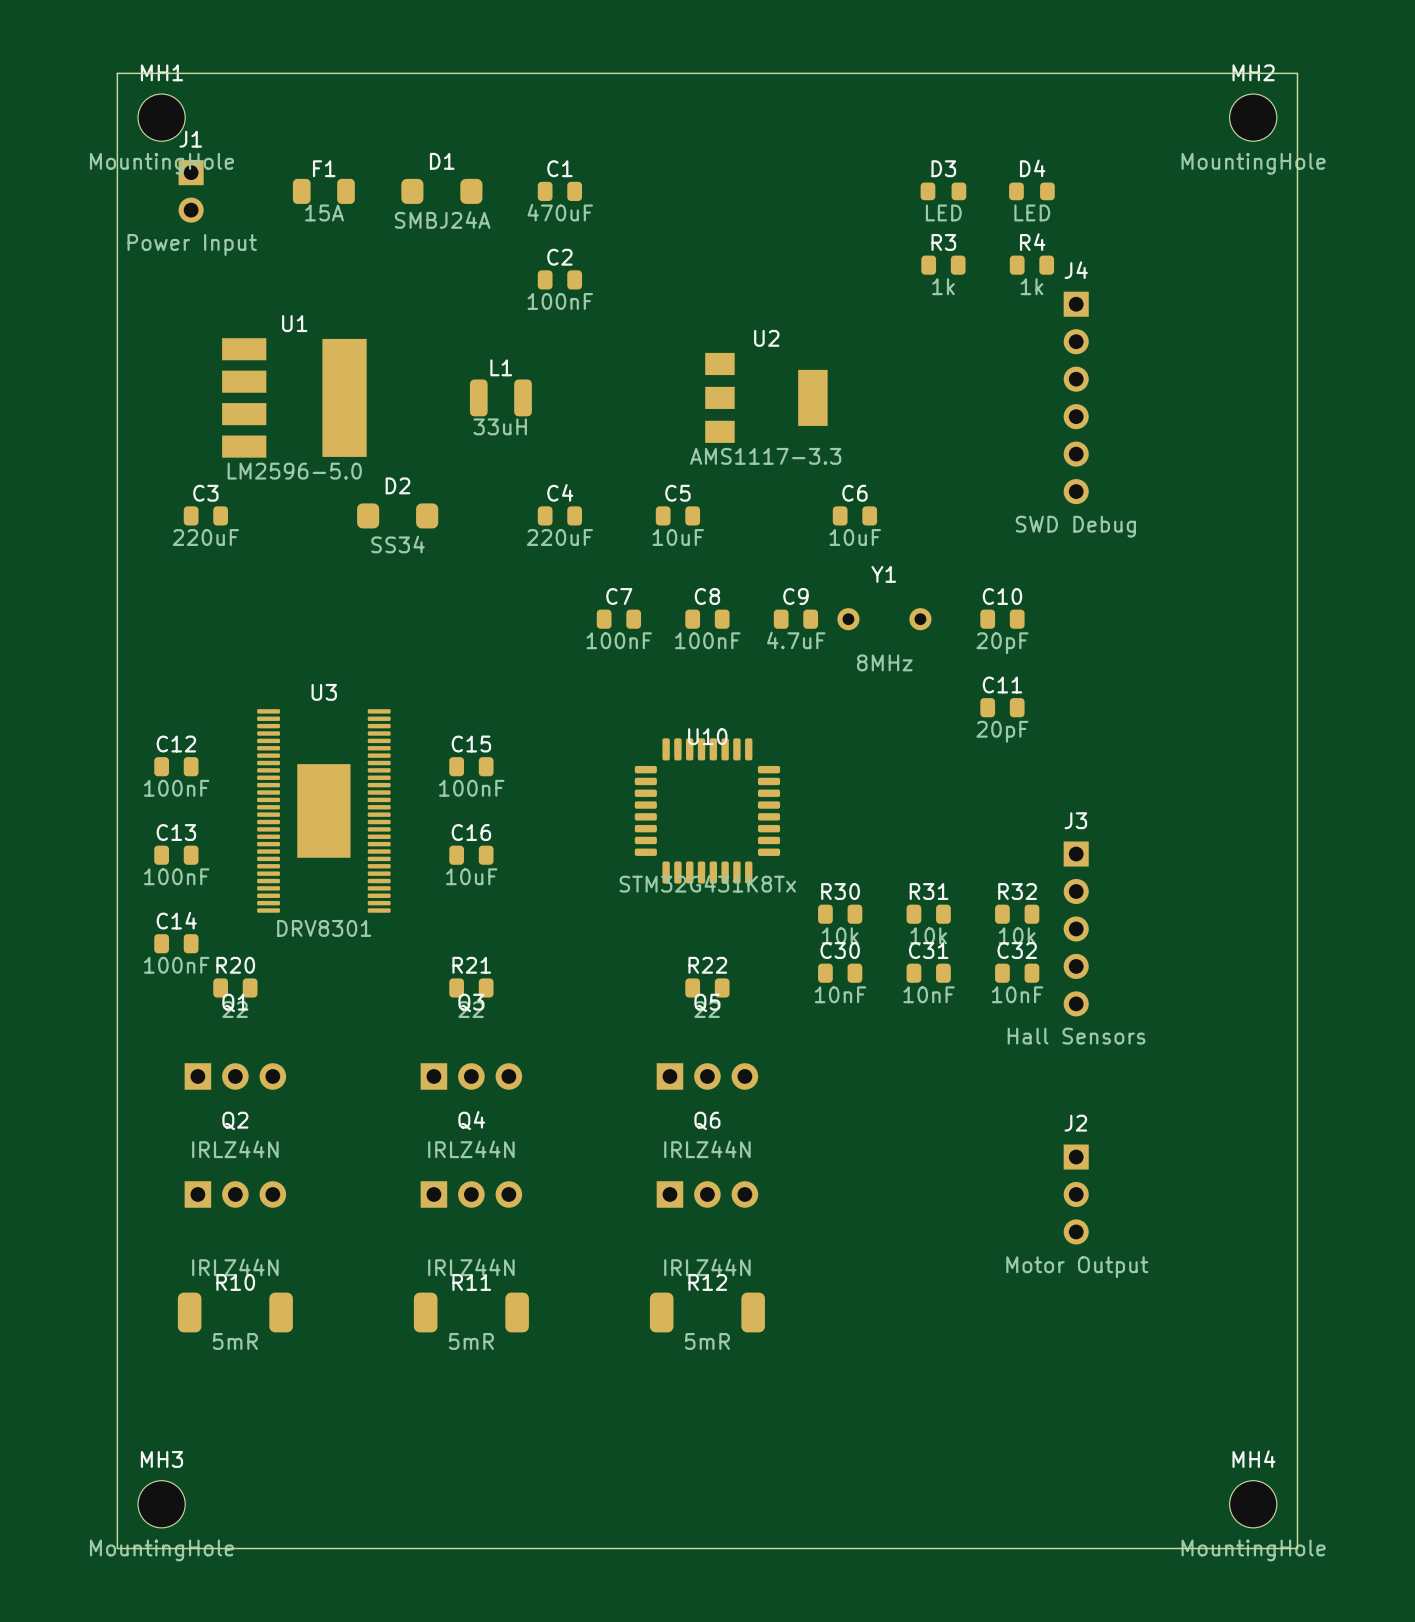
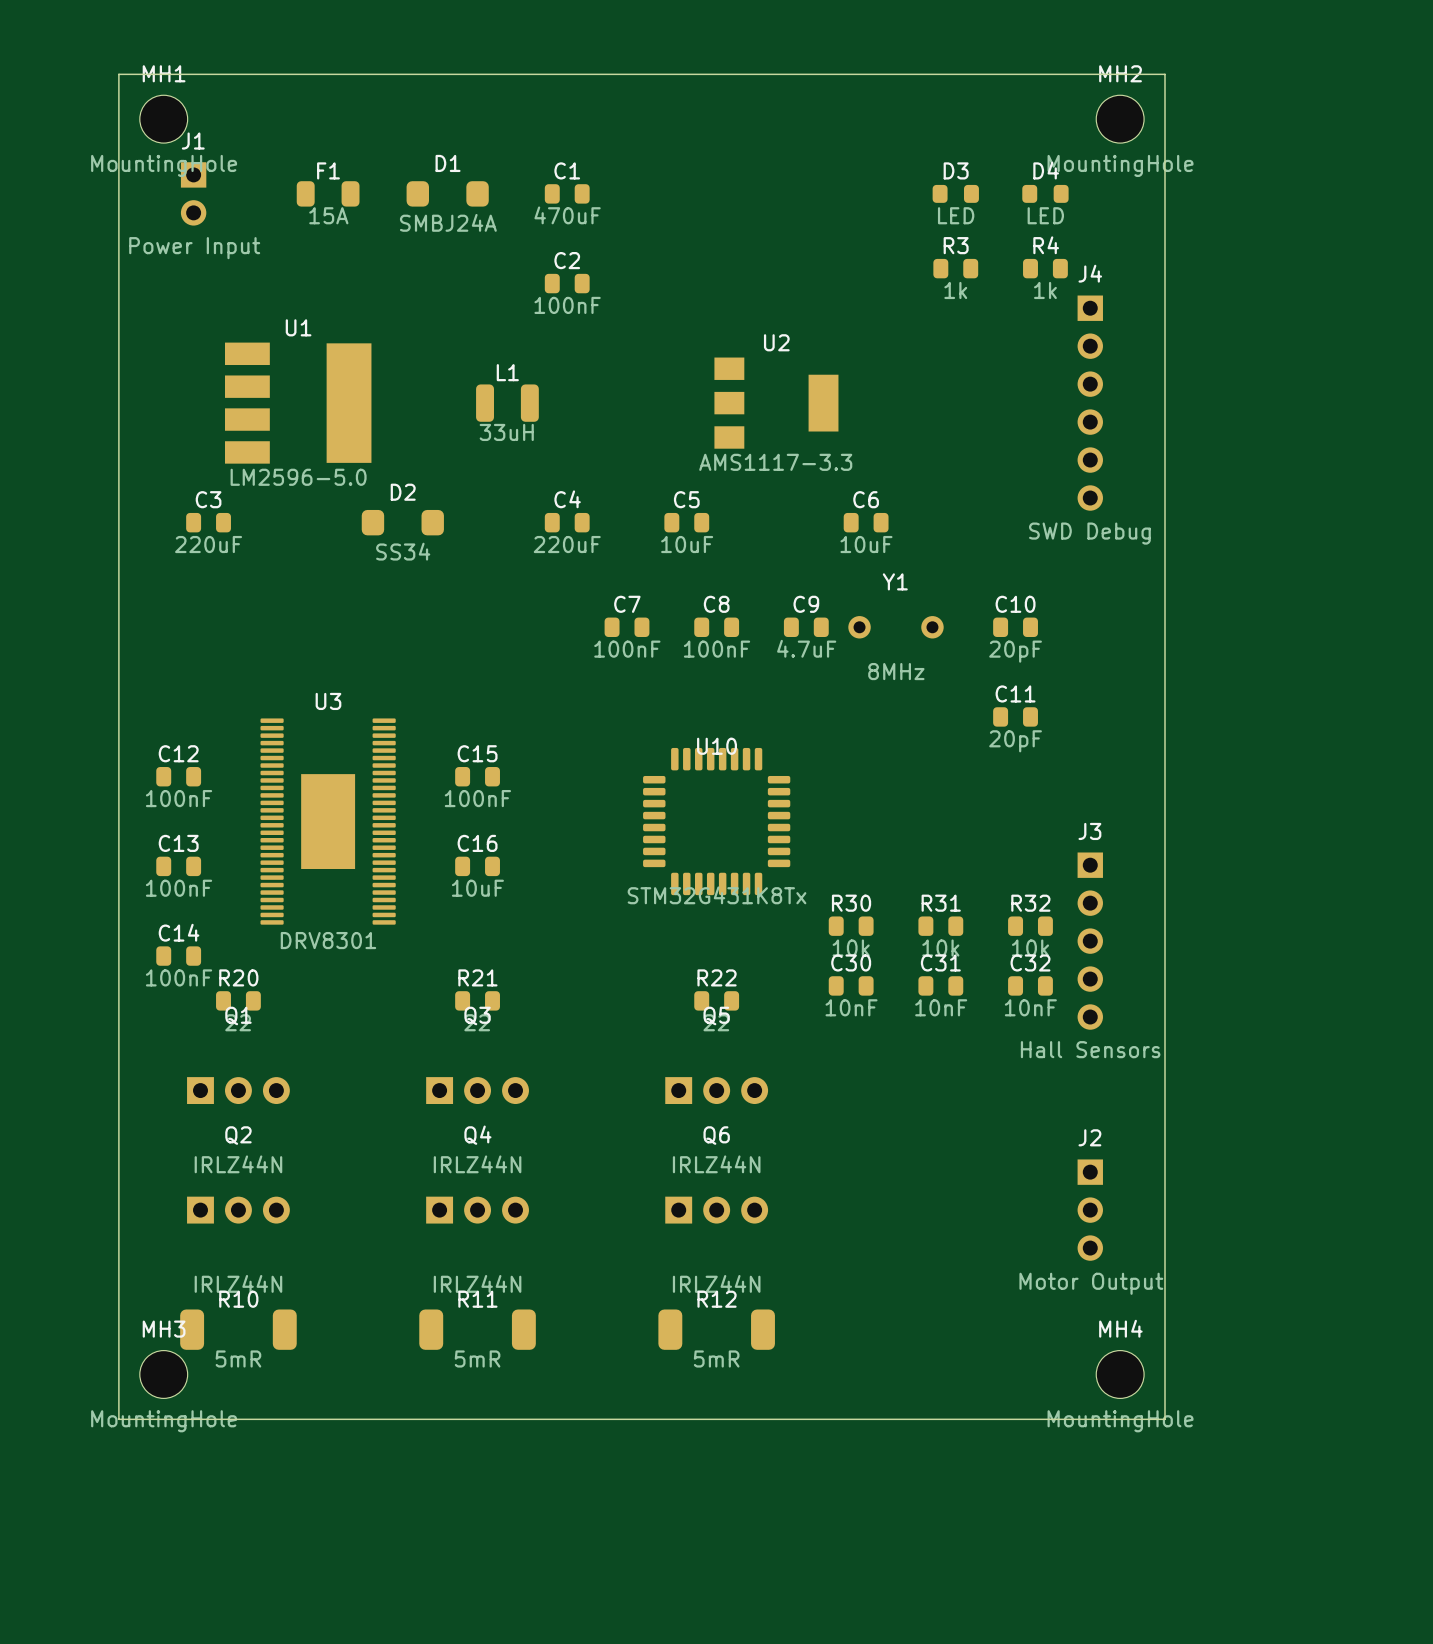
board edge: (1149, 73) (1297, 73) (1297, 1548) (117, 1548) (117, 1401) -> (1165, 74) (1165, 1419) (118, 1419)
MH2 position: (1253, 117) -> (1120, 119)
MH3 position: (161, 1504) -> (163, 1374)
MH4 position: (1253, 1504) -> (1120, 1374)

